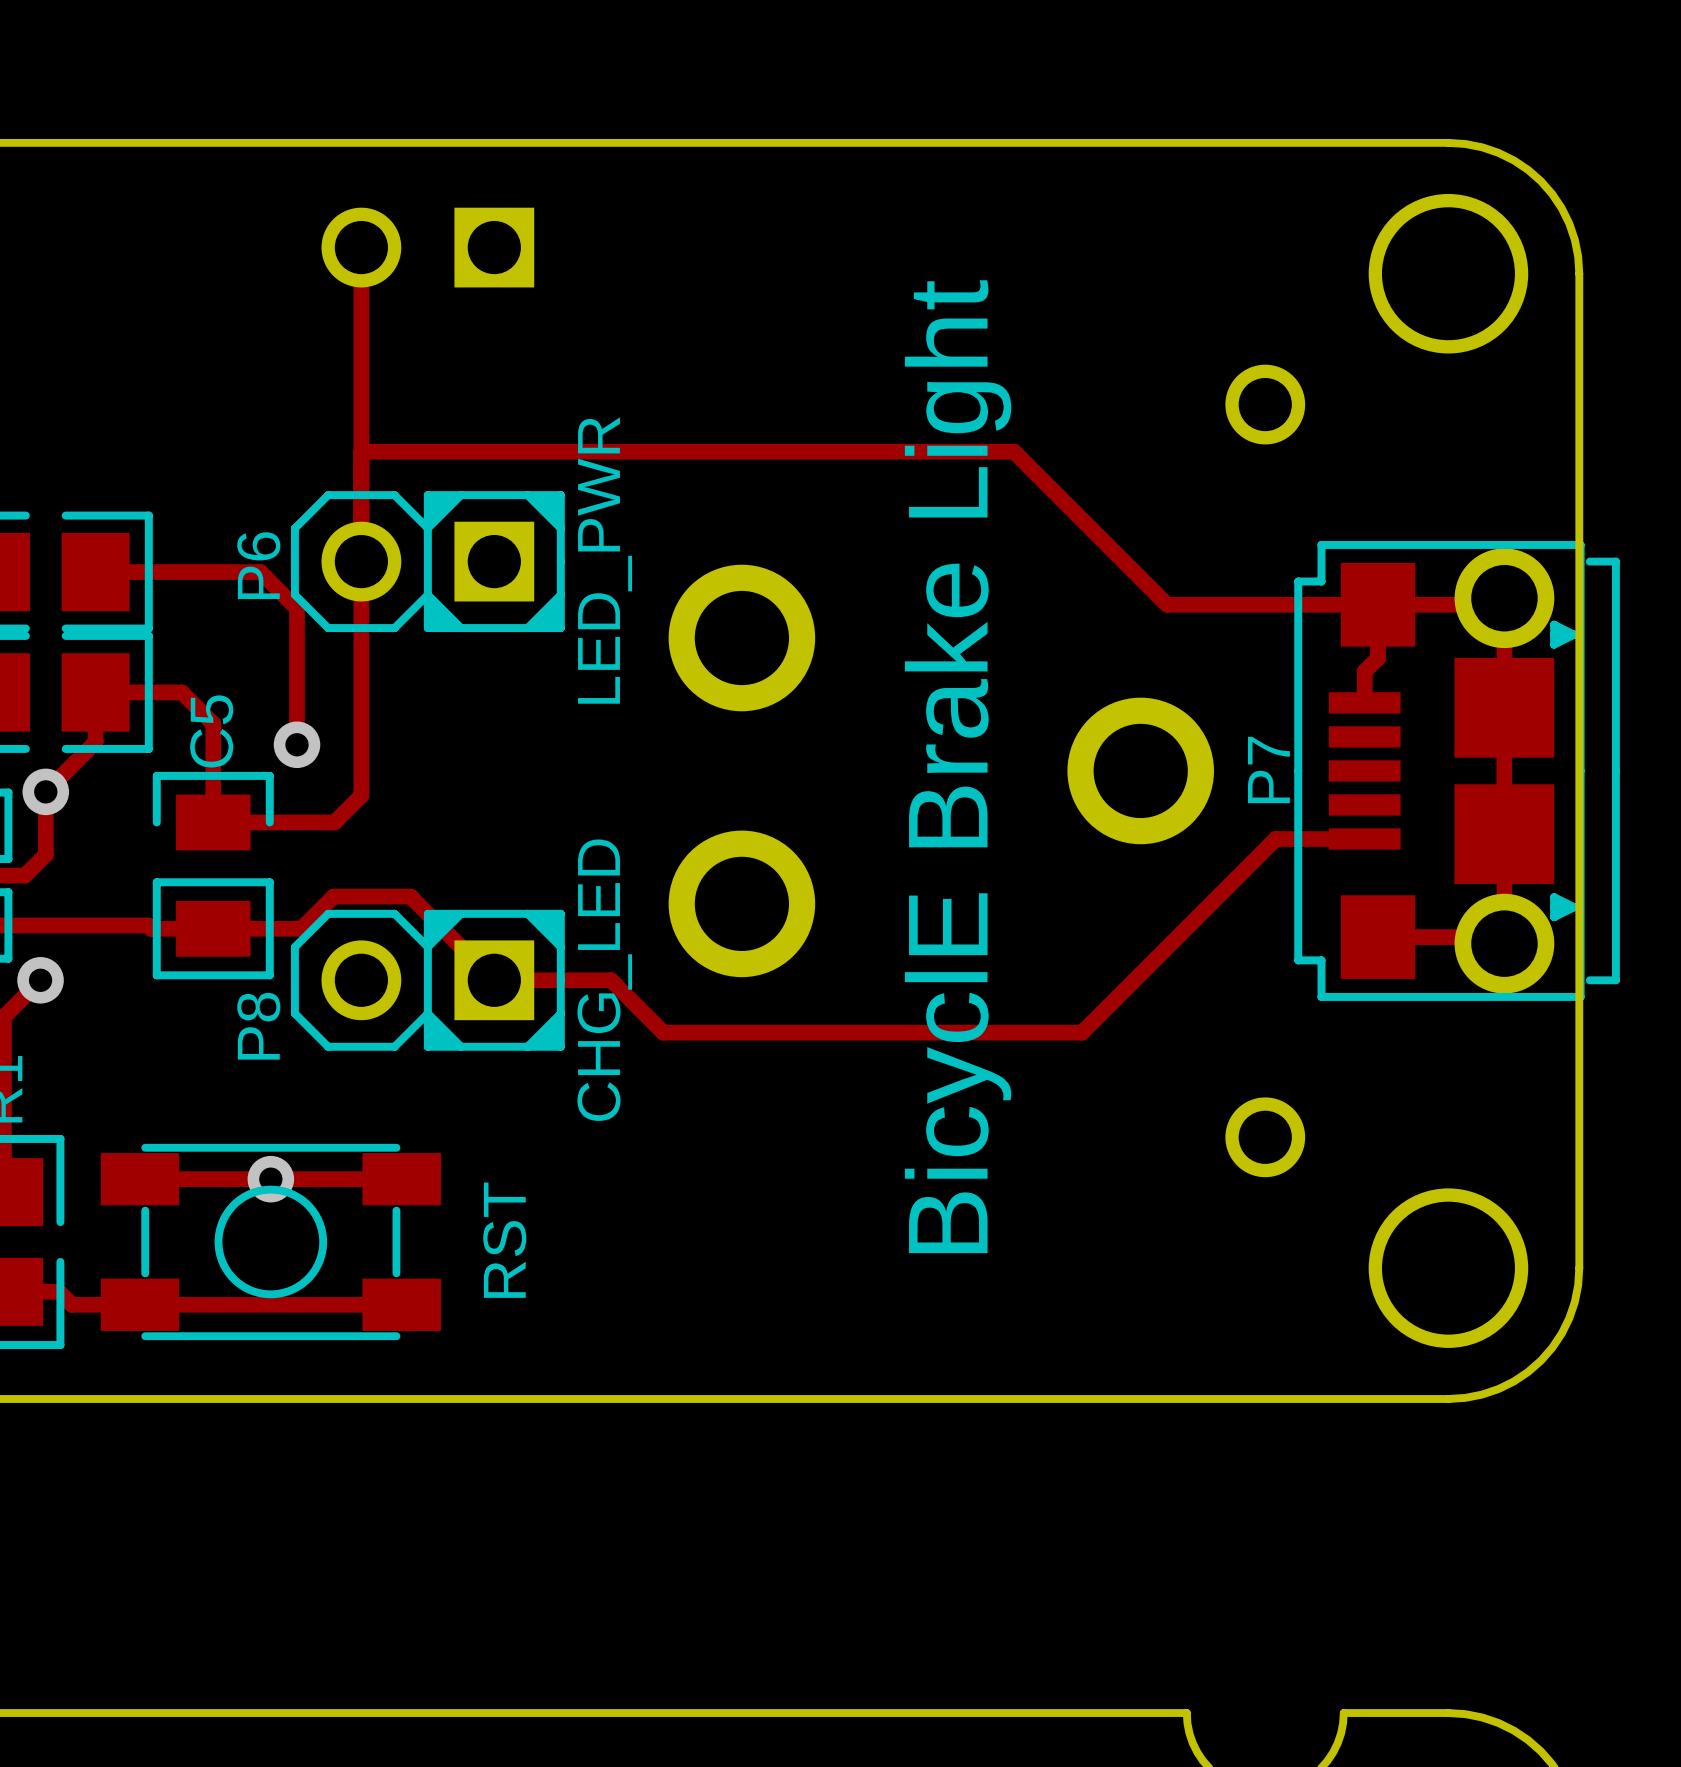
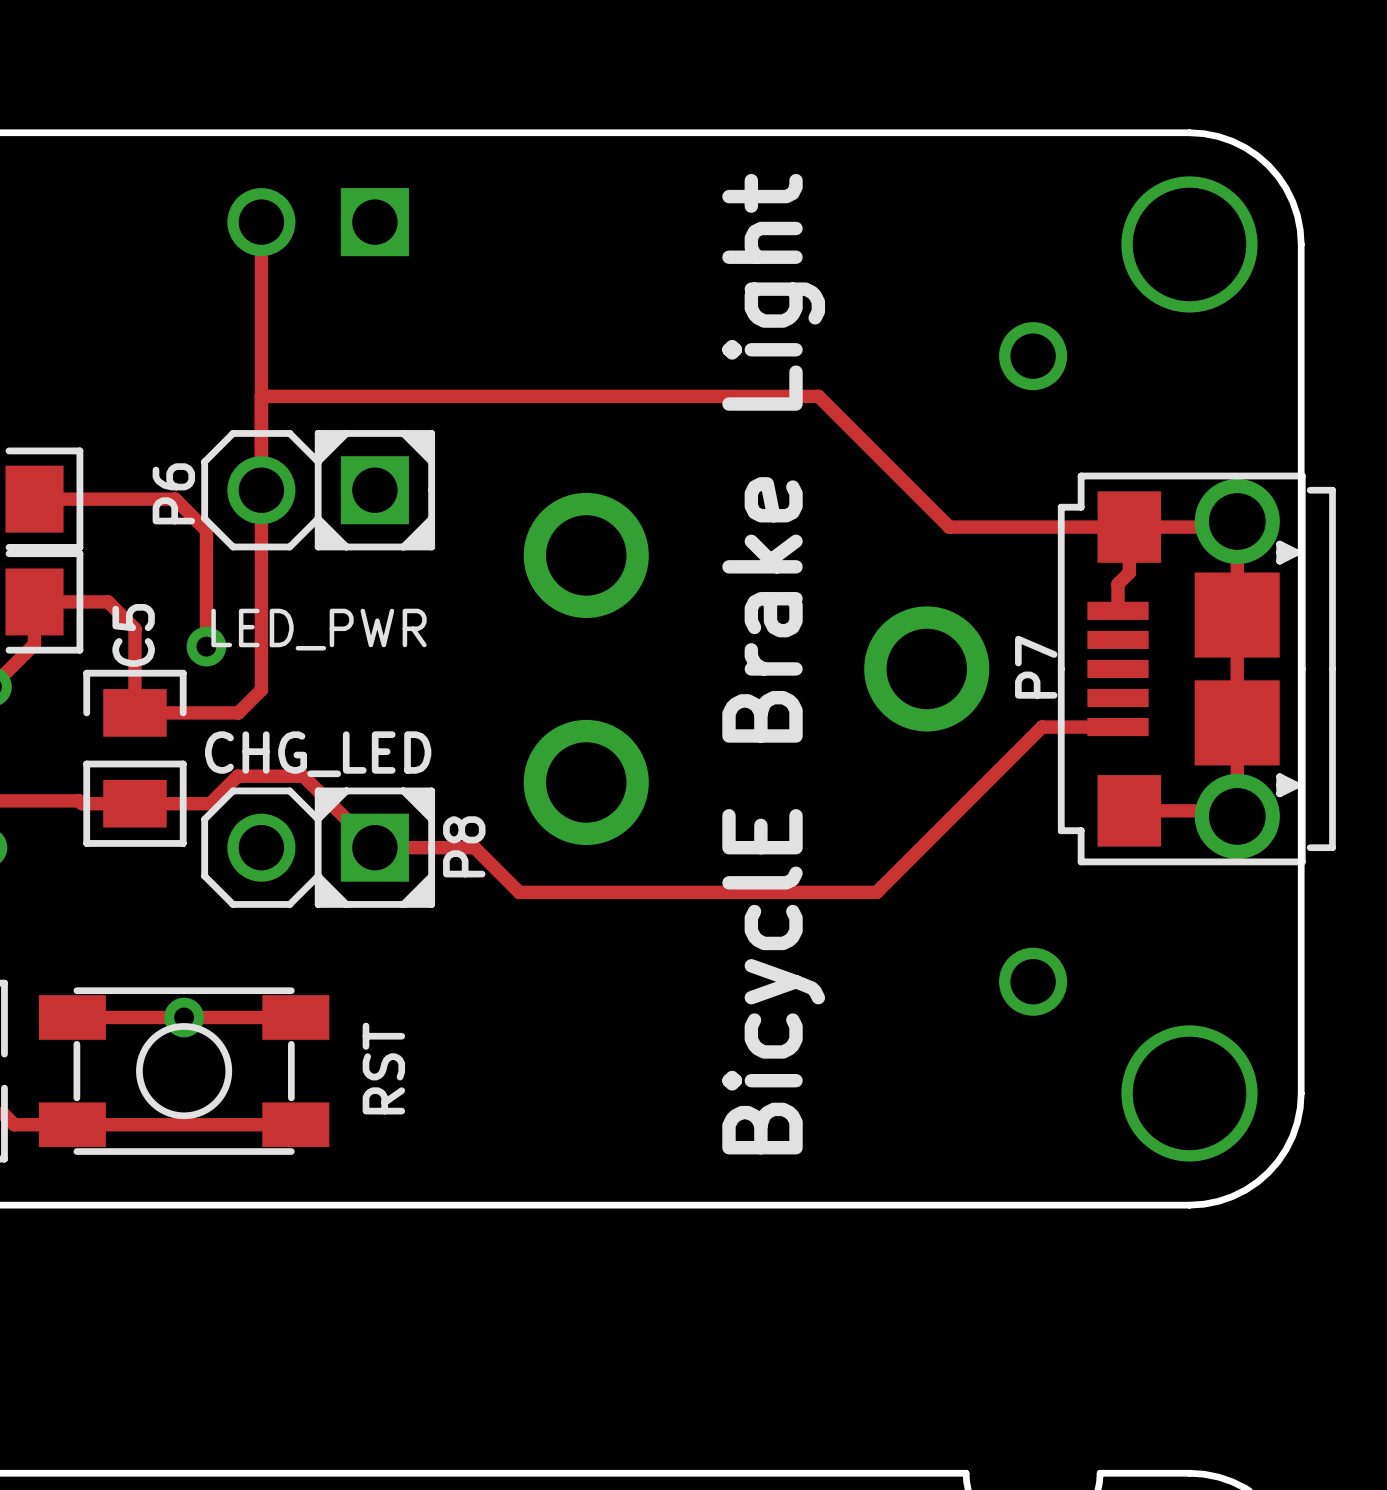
P6 value rotation: 0° (605, 560) -> 90° clockwise (318, 629)
P8 value rotation: 0° (604, 980) -> 90° clockwise (318, 754)
P8 name position: P8 (258, 1026) -> P8 (464, 846)

